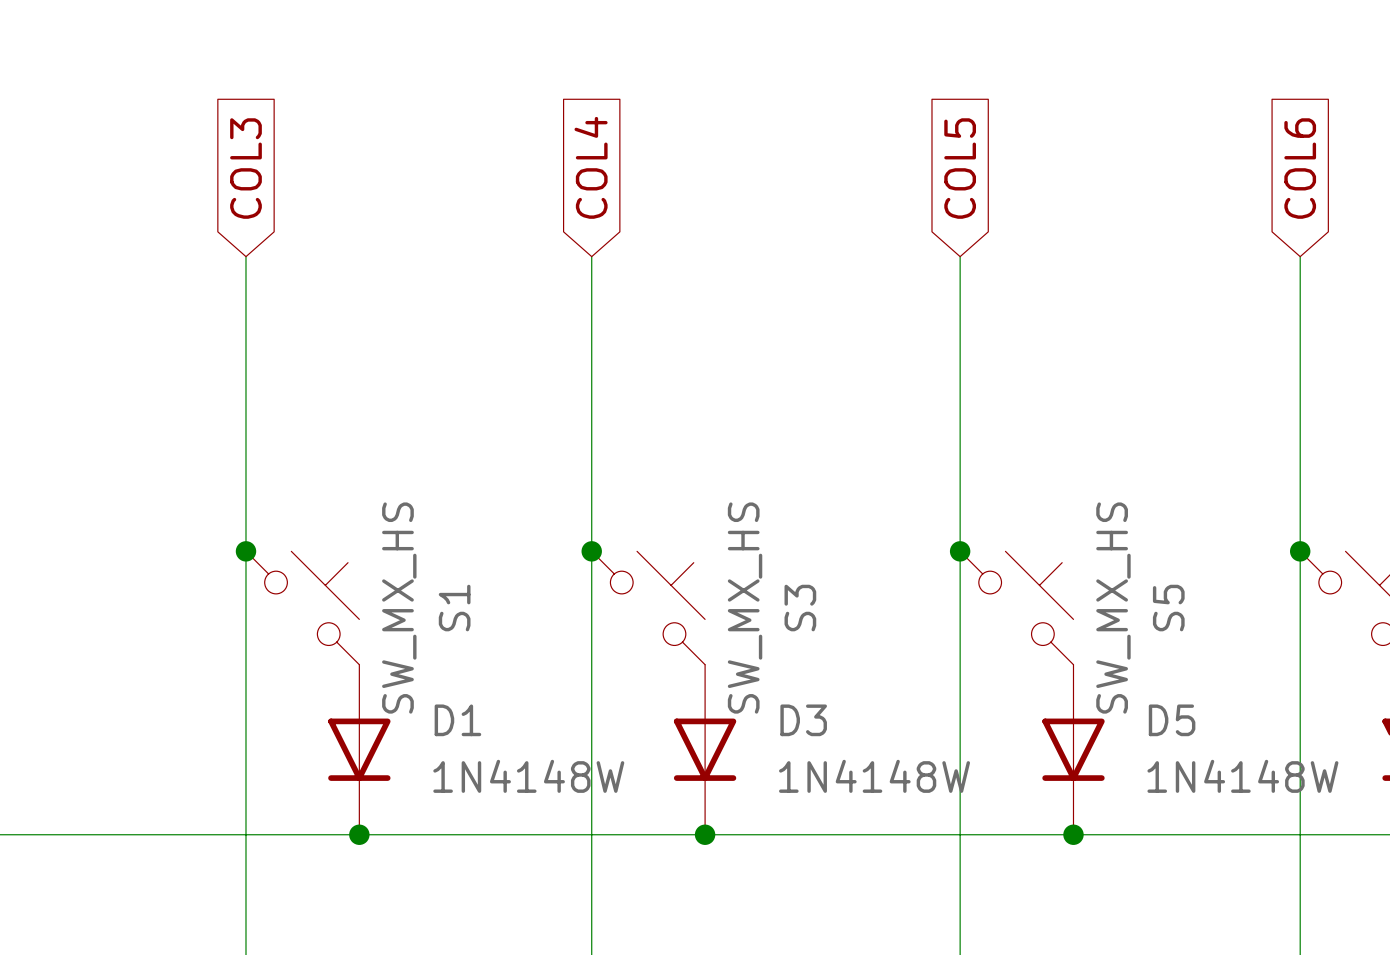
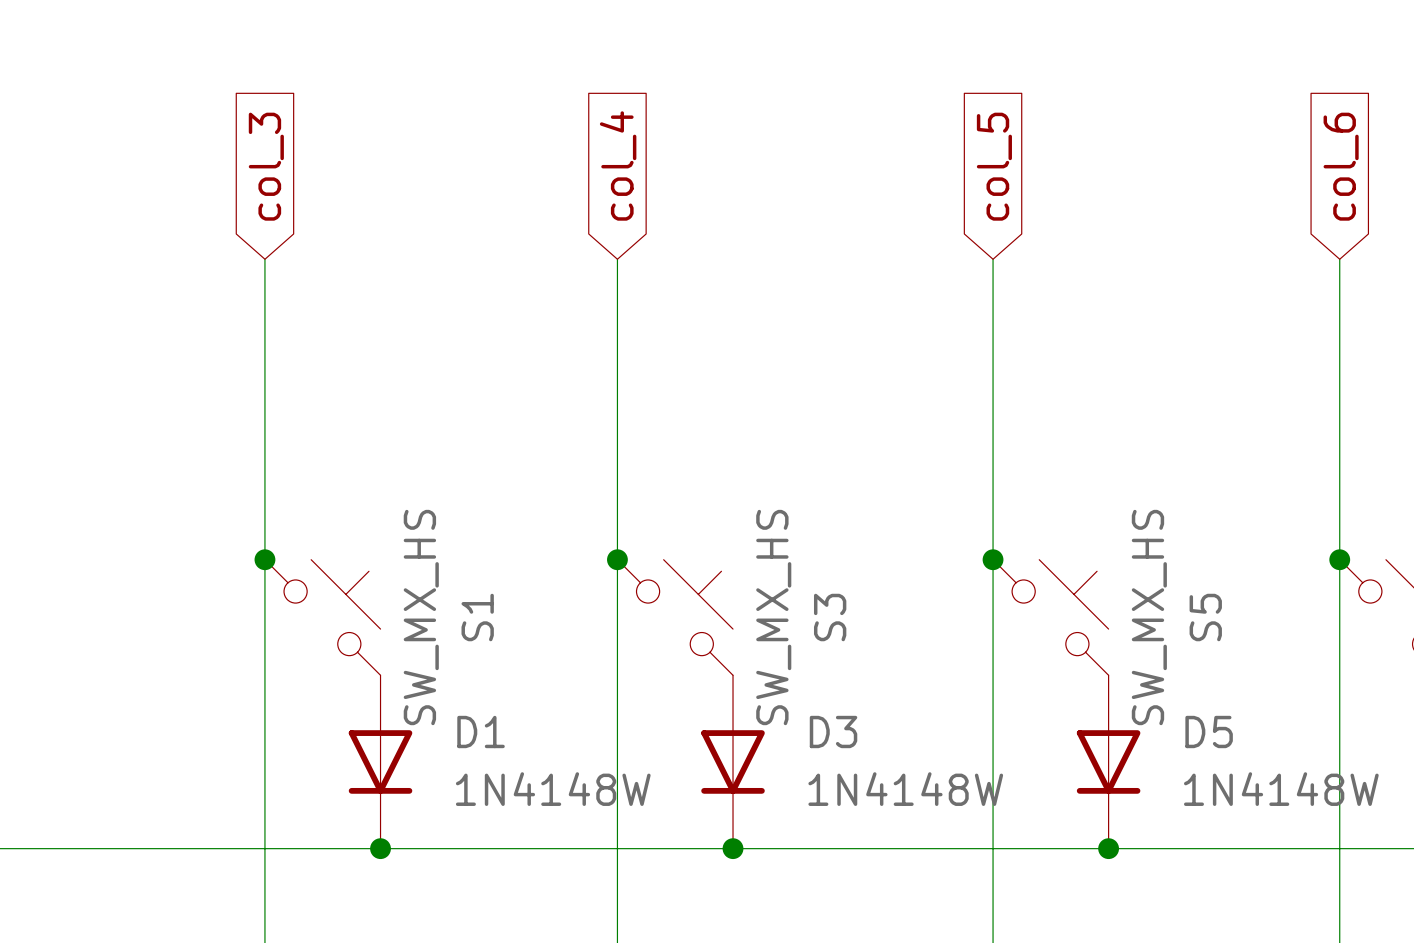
global label: COL4 (591, 167) -> col_4 (618, 166)
global label: COL3 (245, 168) -> col_3 (266, 166)
global label: COL5 (960, 168) -> col_5 (994, 166)
global label: COL6 (1300, 168) -> col_6 (1341, 166)

